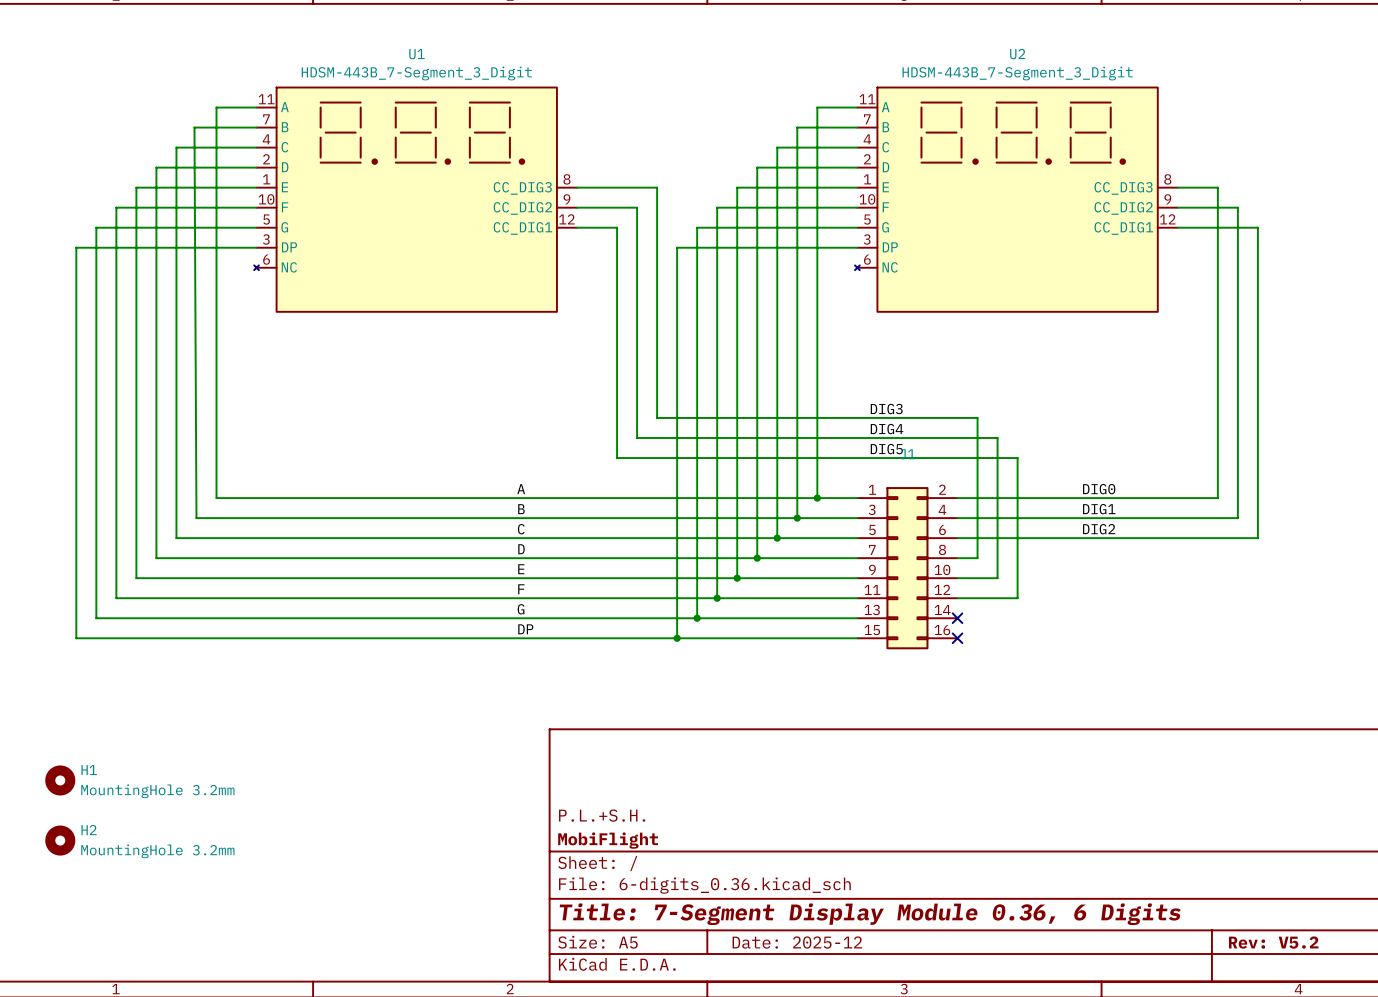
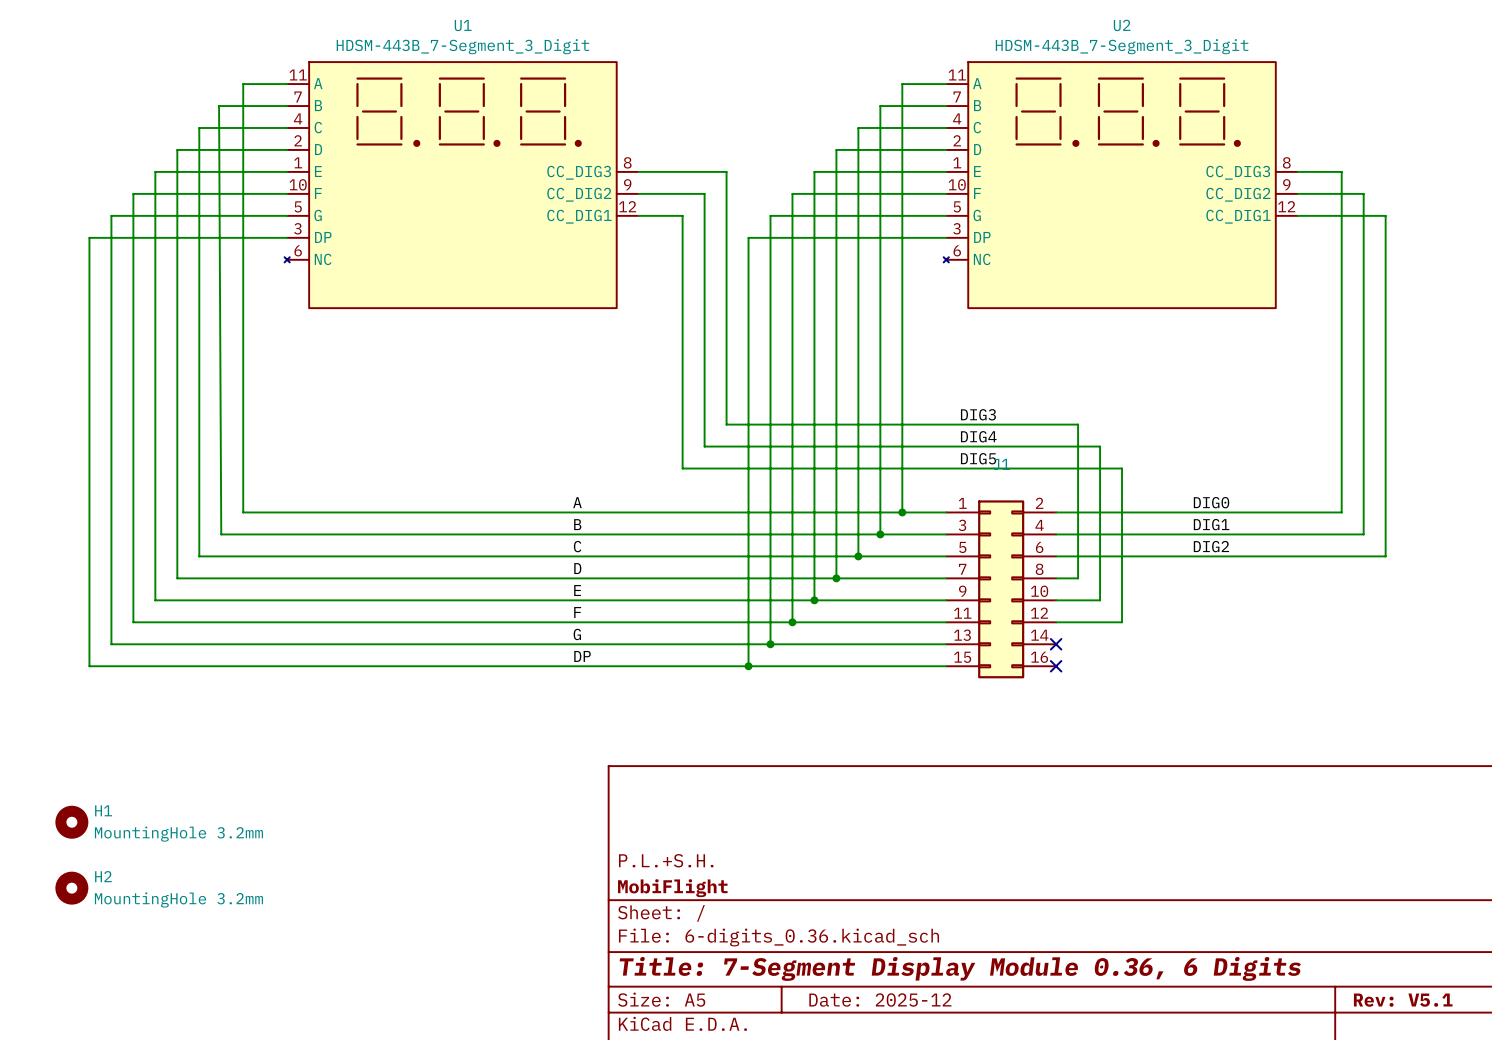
title block: Rev: V5.2 (1273, 942) -> Rev: V5.1 (1403, 1000)

